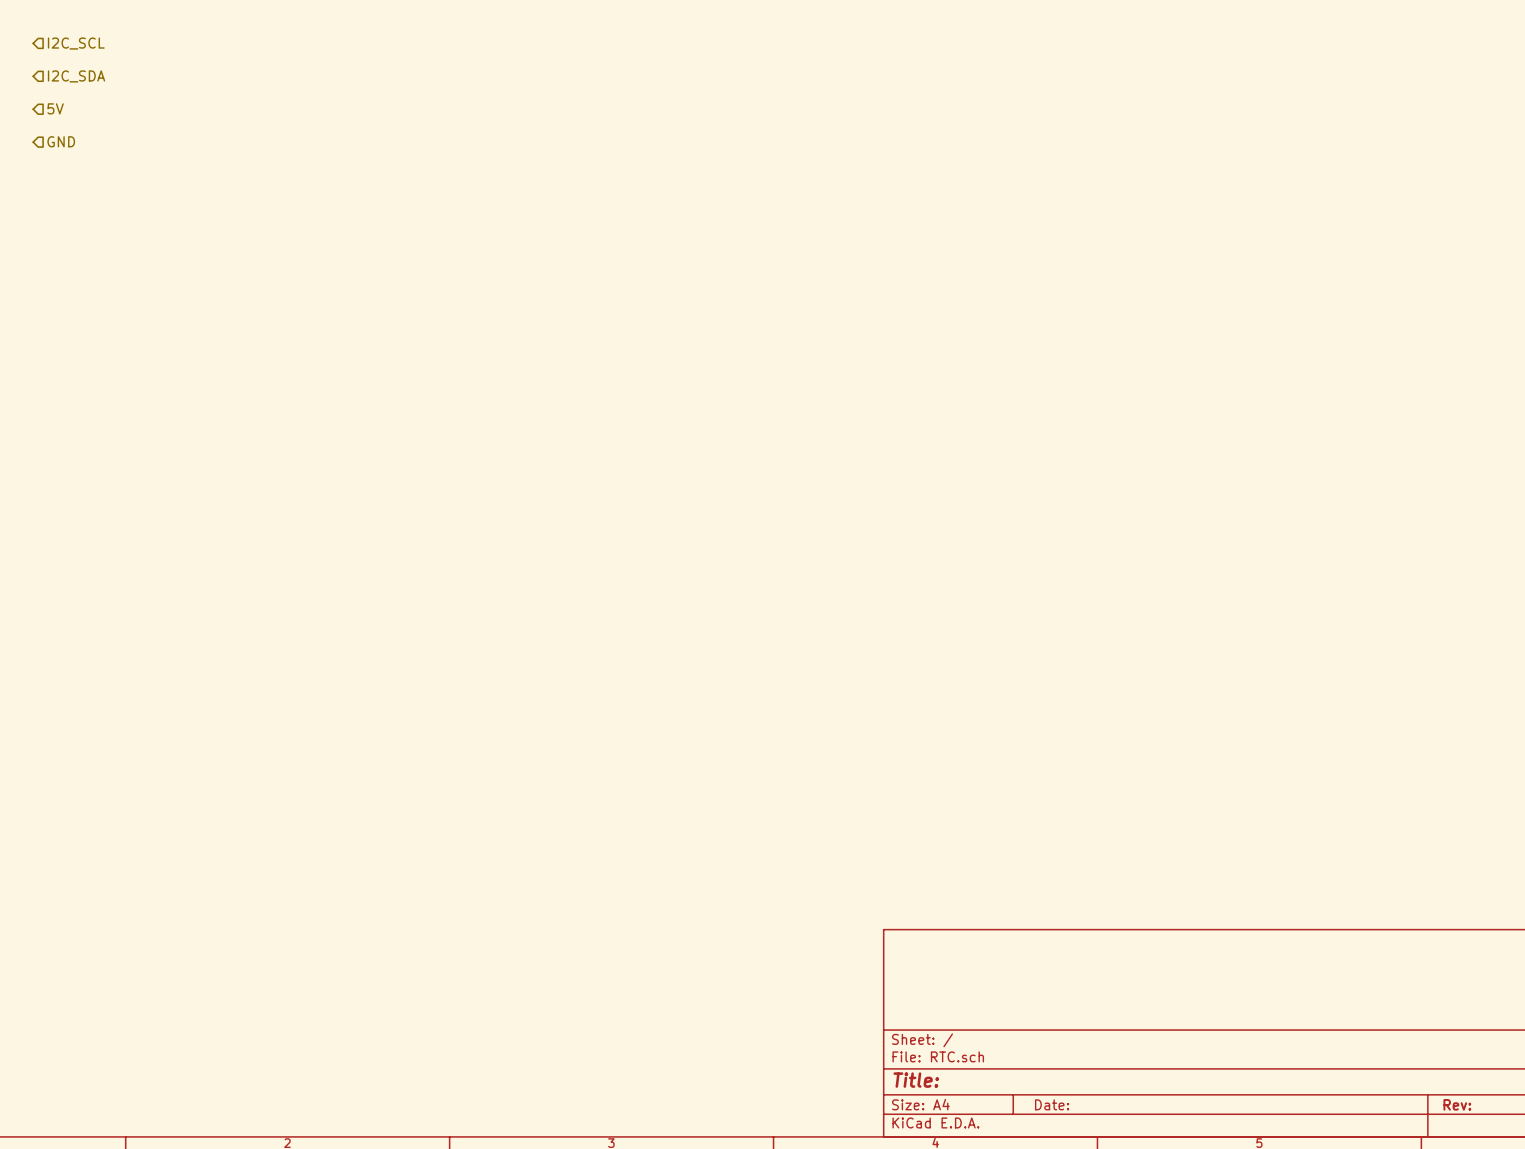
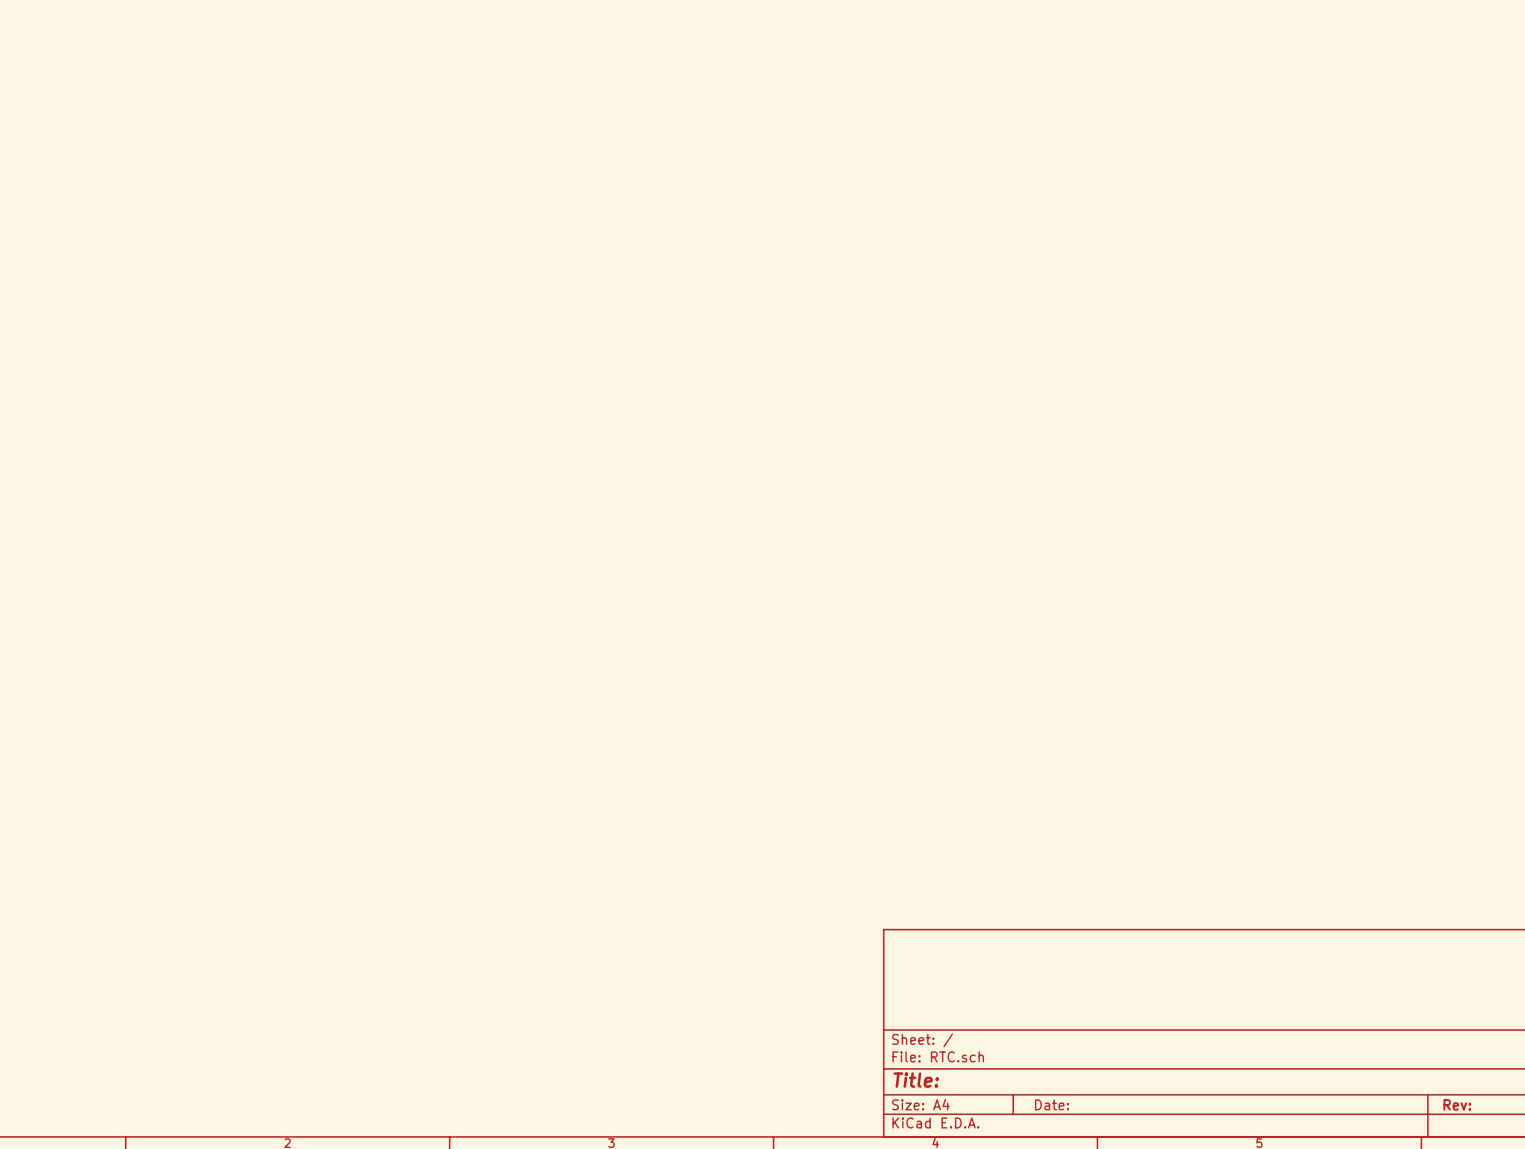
hierarchical label: I2C_SCL (76, 43) -> none
hierarchical label: I2C_SDA (76, 76) -> none
hierarchical label: 5V (55, 108) -> none
hierarchical label: GND (61, 141) -> none

